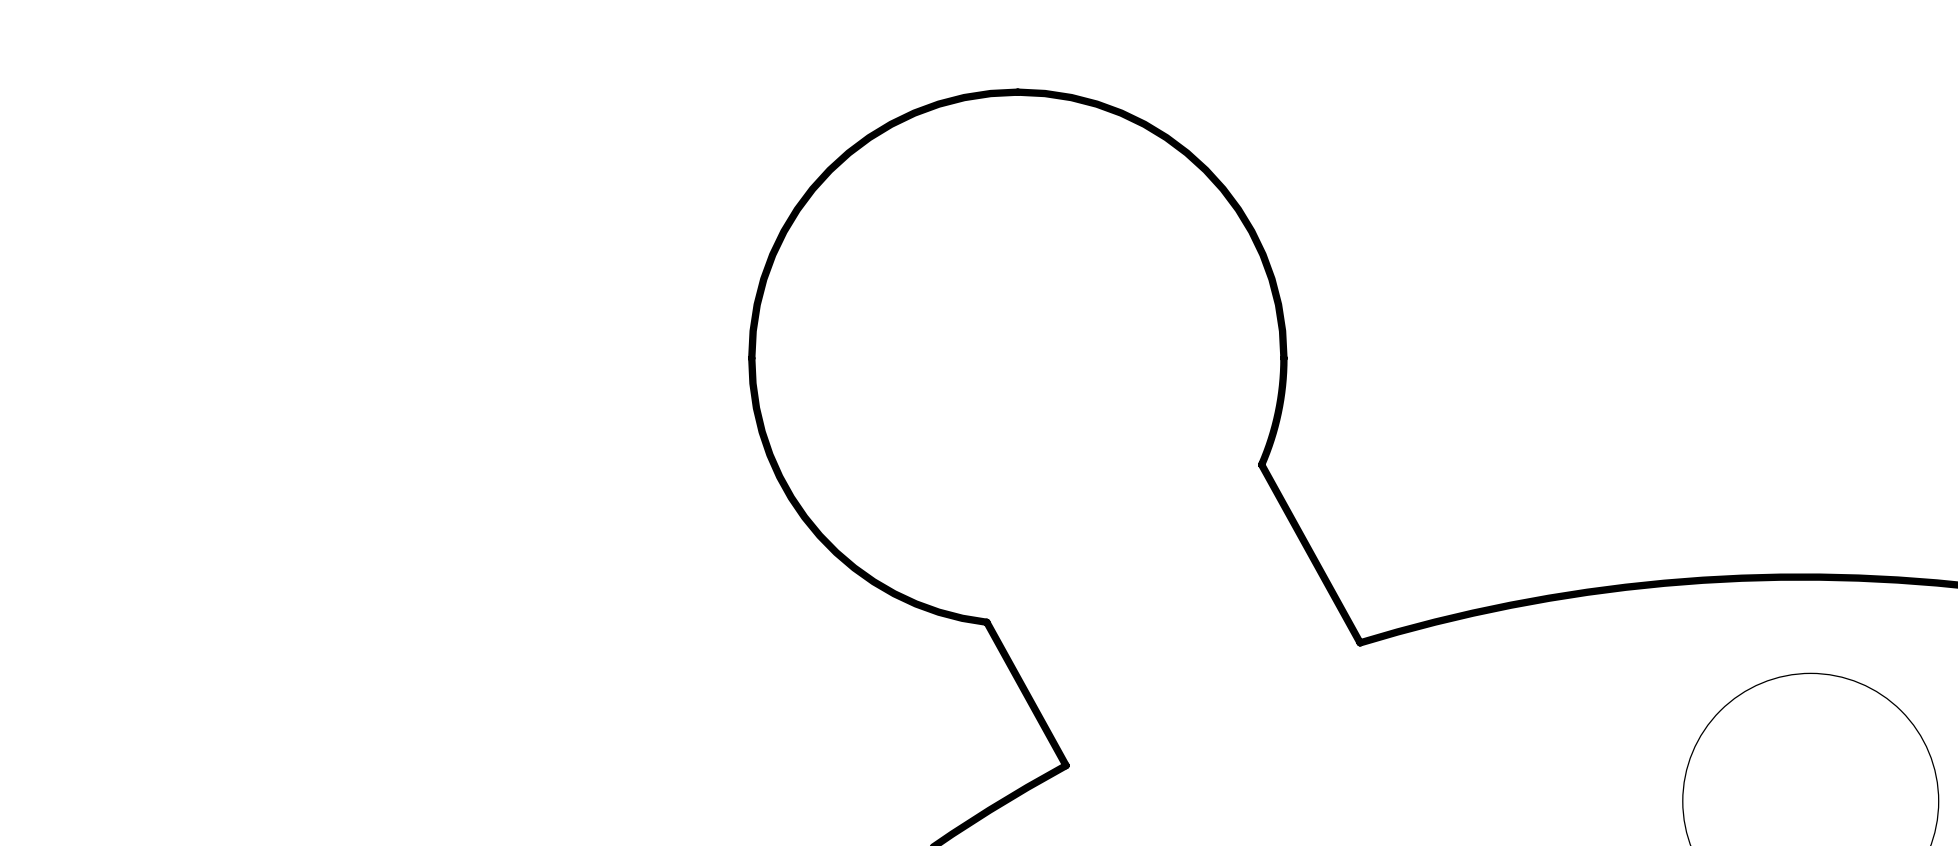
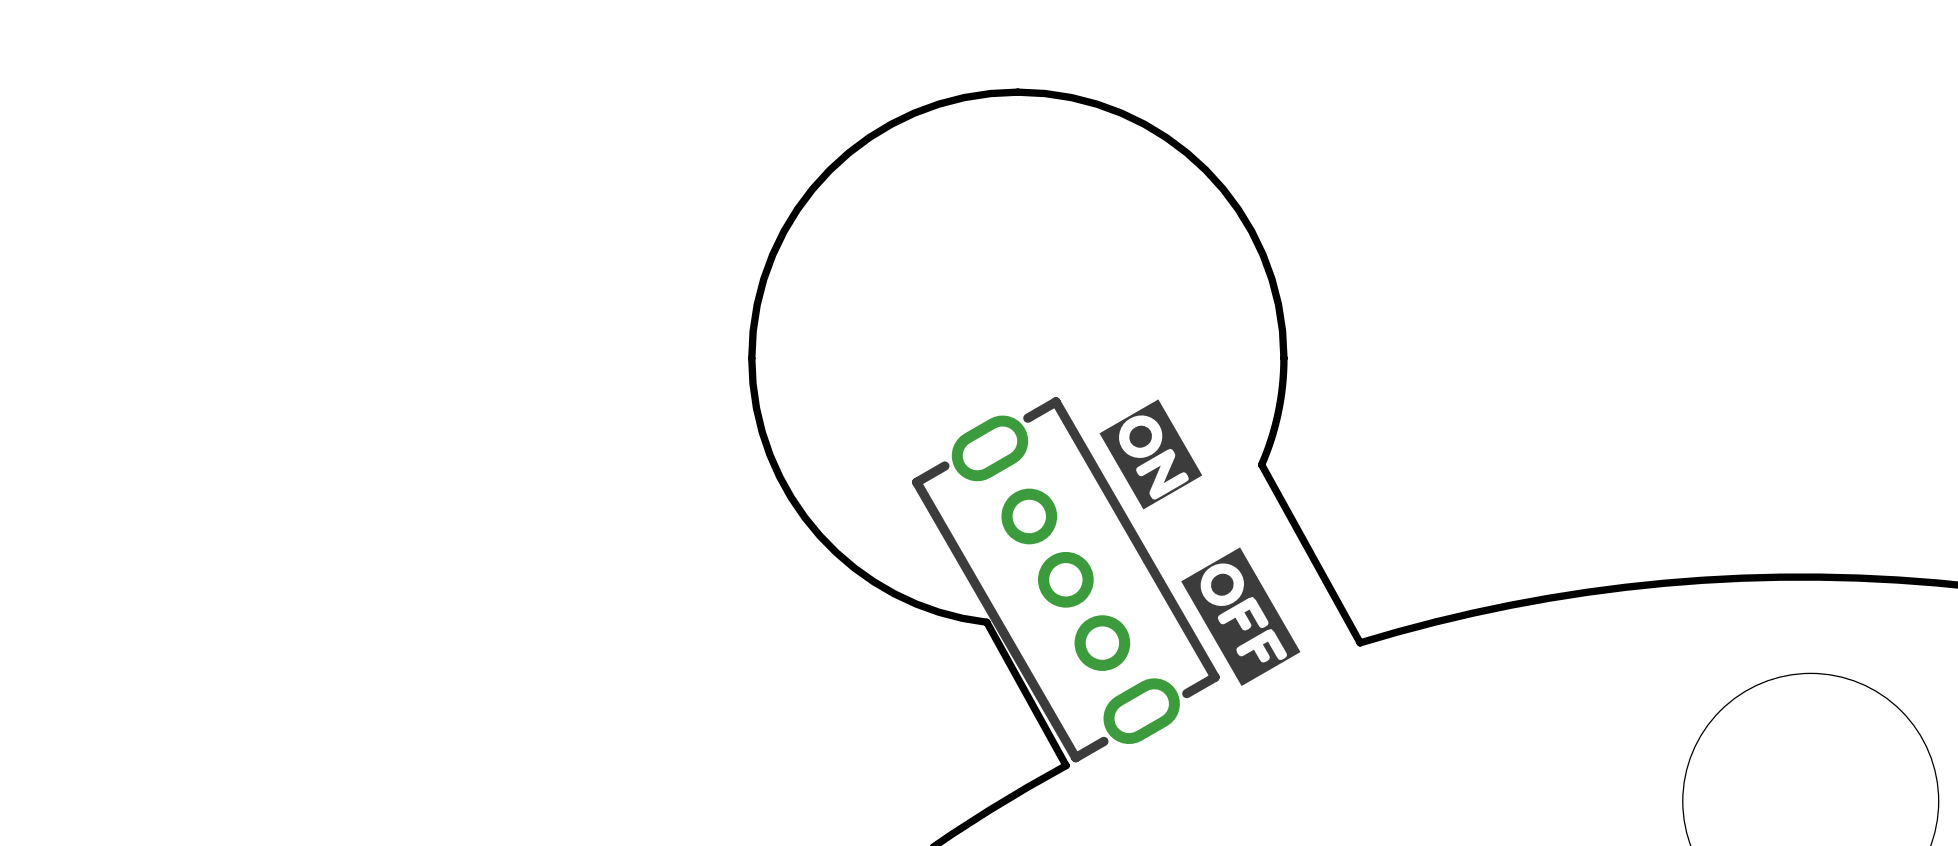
drawing: none -> [1099, 399, 1301, 687]
part: none -> (1065, 579)

